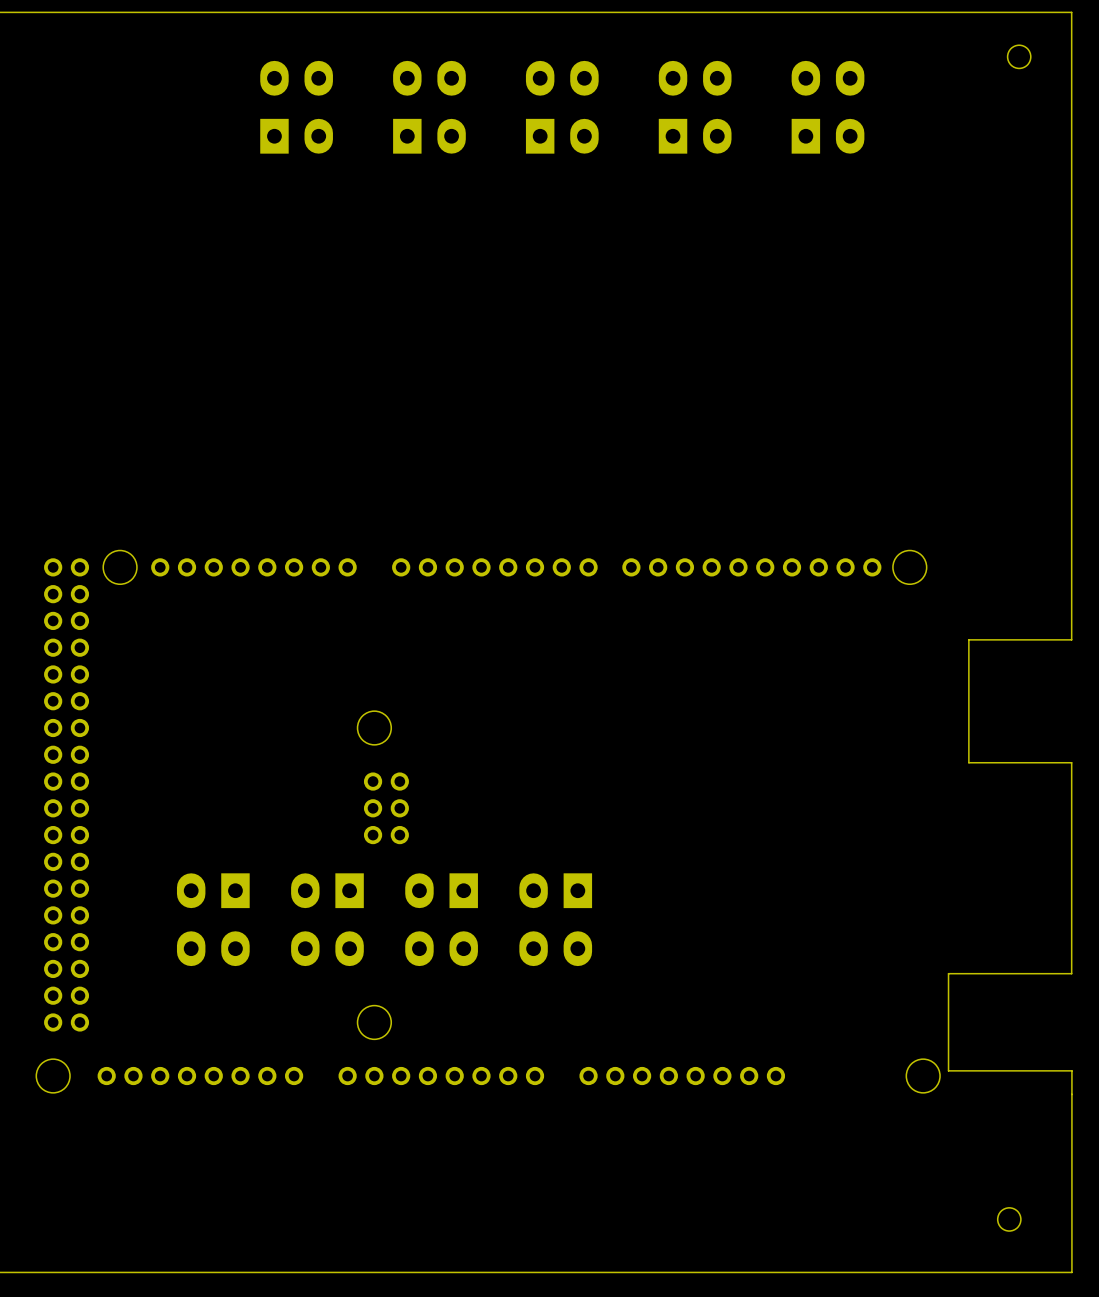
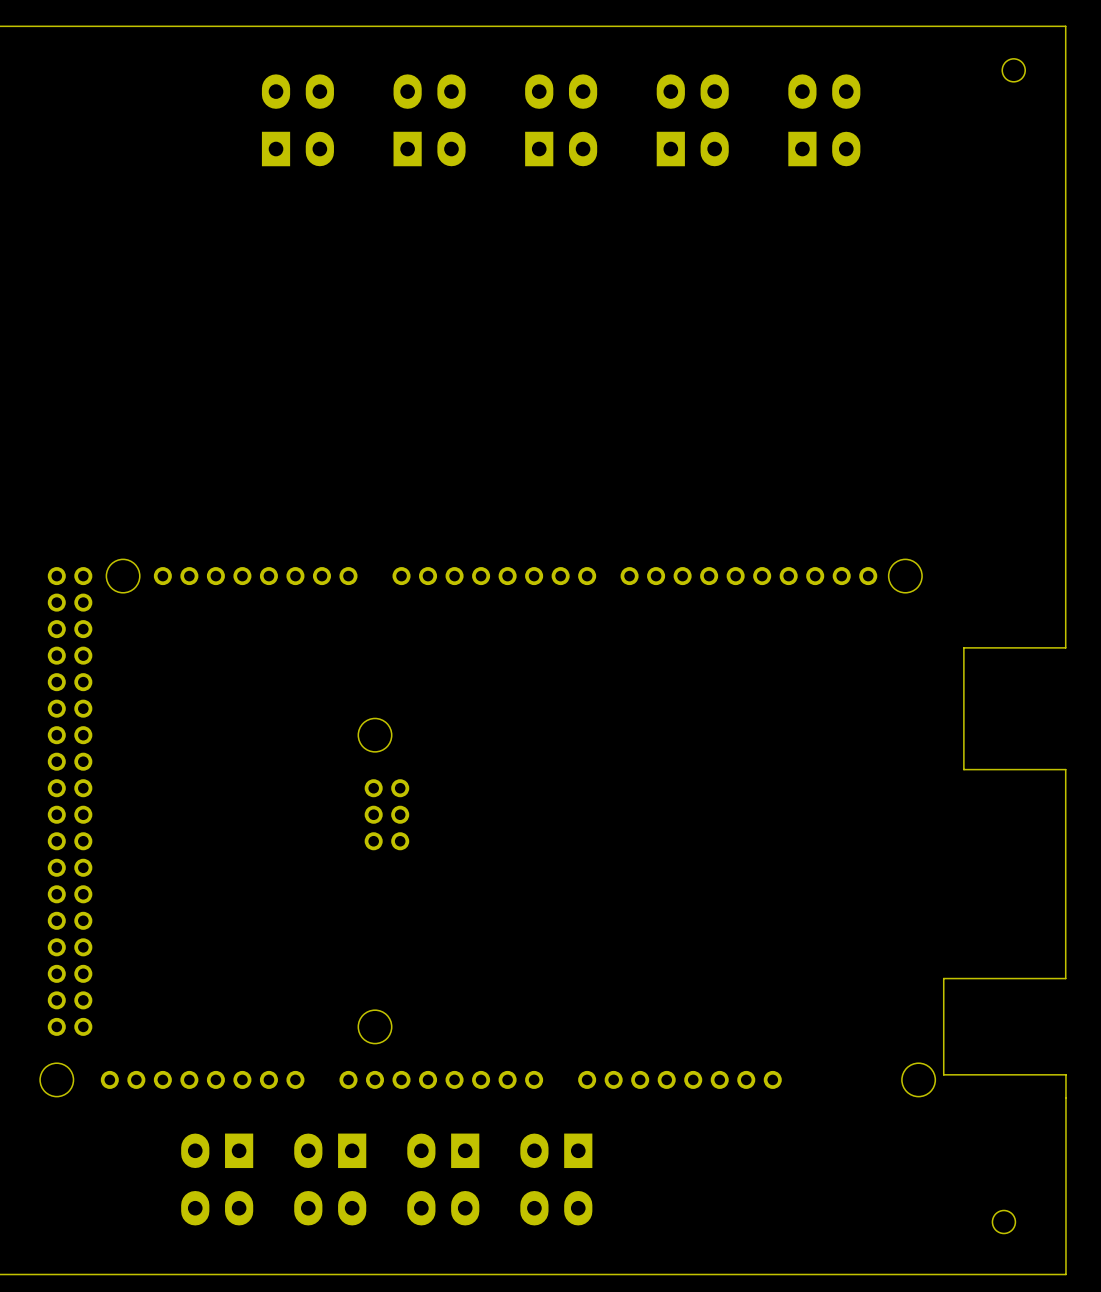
part: (213, 919) -> none
part: (327, 919) -> none
part: (441, 919) -> none
part: (555, 919) -> none
part: none -> (217, 1179)
part: none -> (330, 1179)
part: none -> (443, 1179)
part: none -> (556, 1179)

